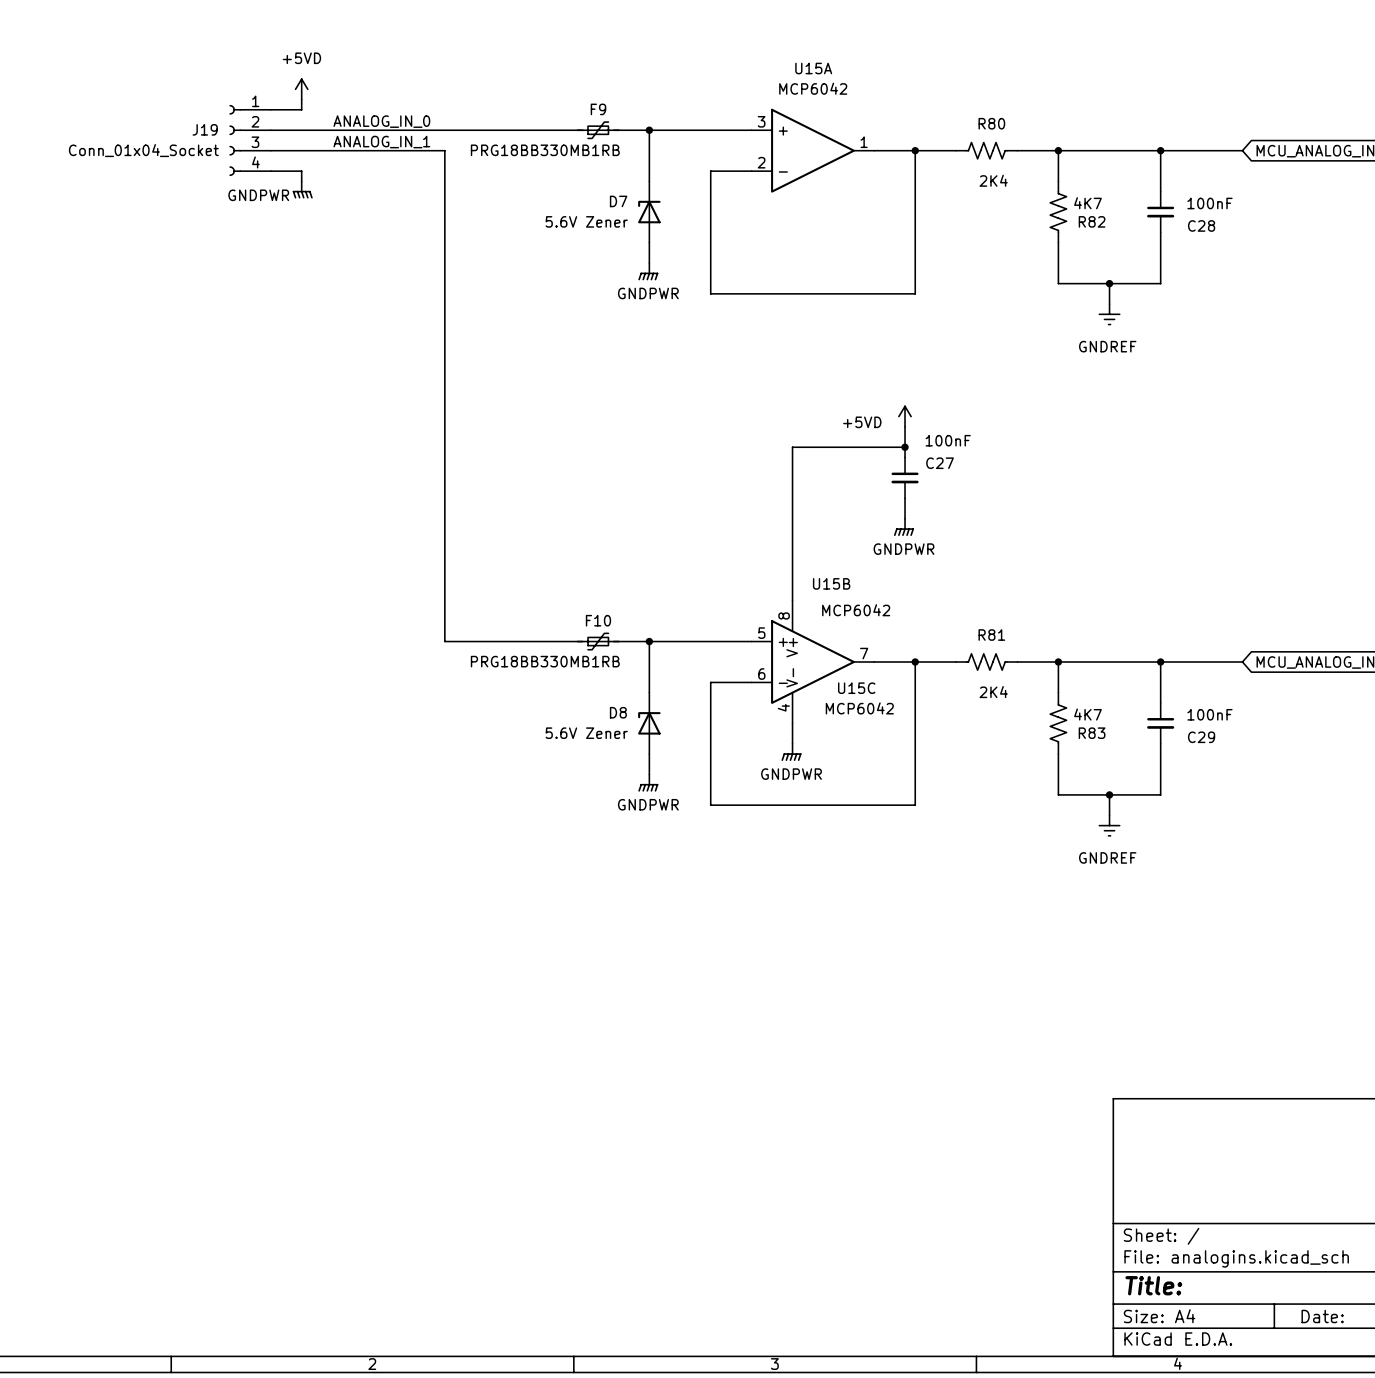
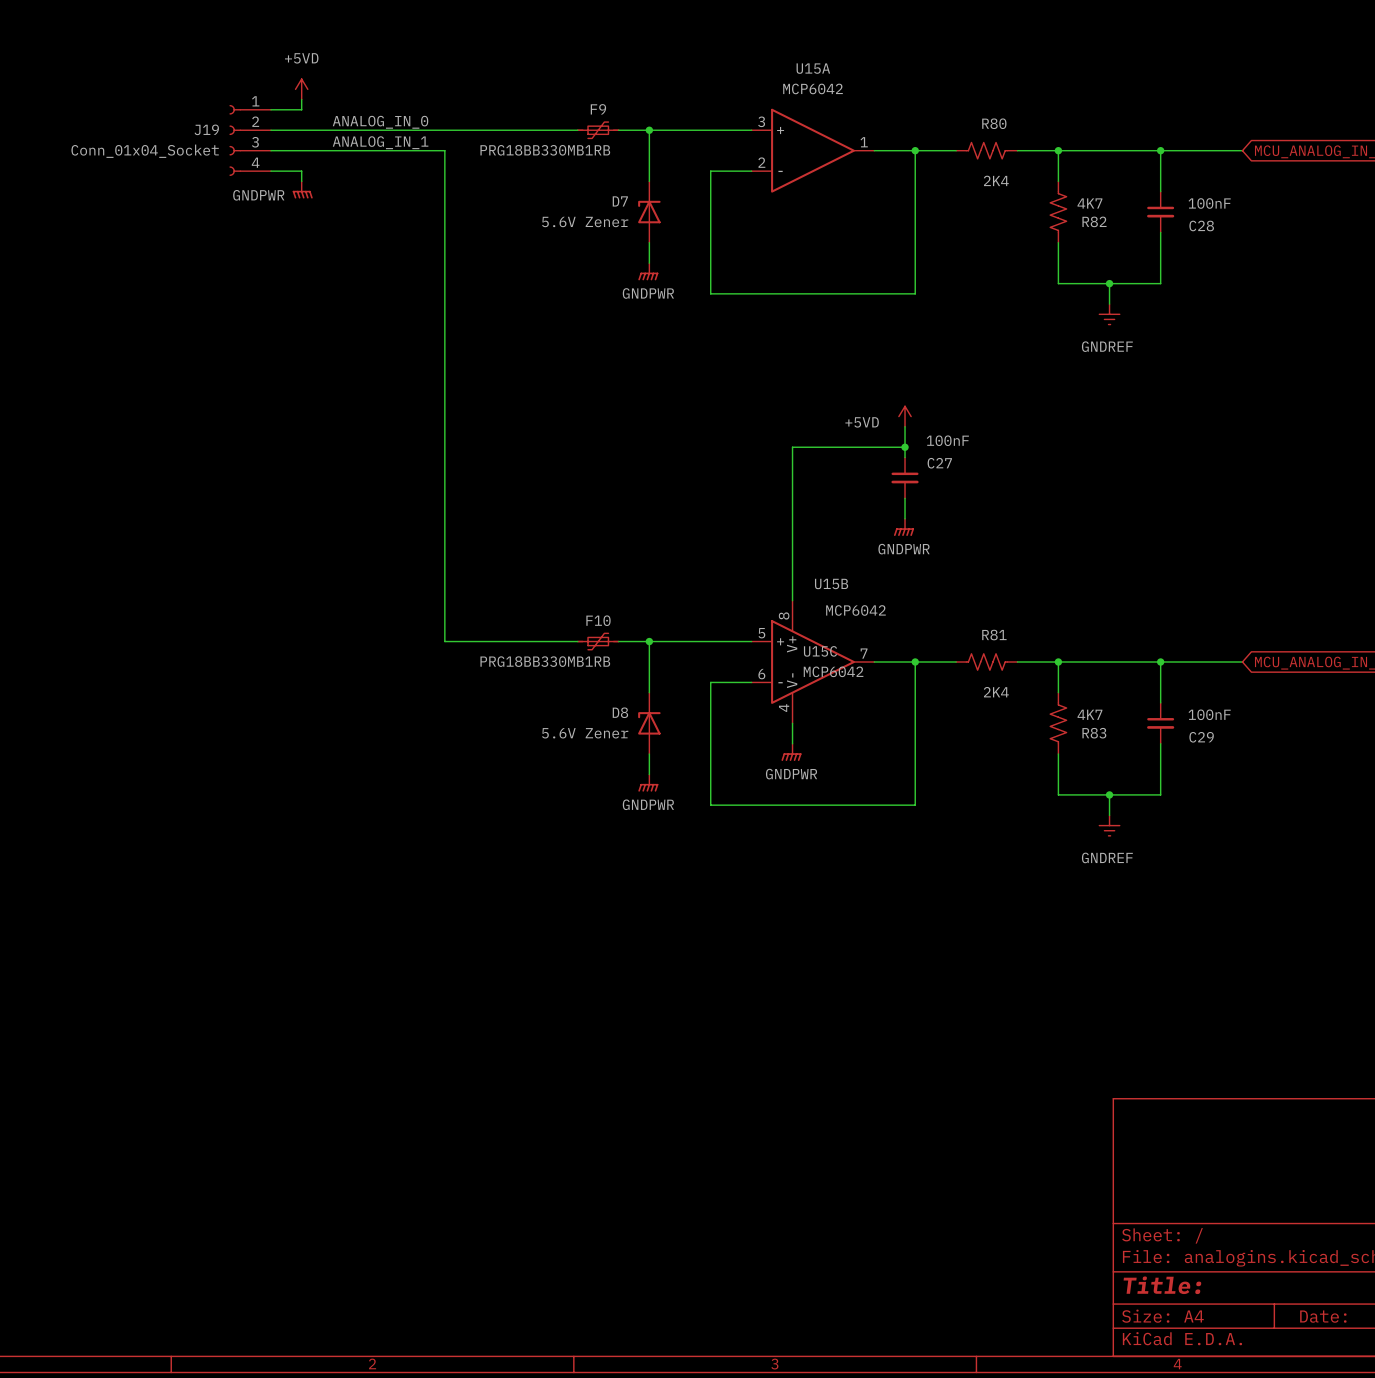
U15C name position: U15C (856, 688) -> U15C (820, 651)
U15C value position: MCP6042 (859, 708) -> MCP6042 (833, 671)

